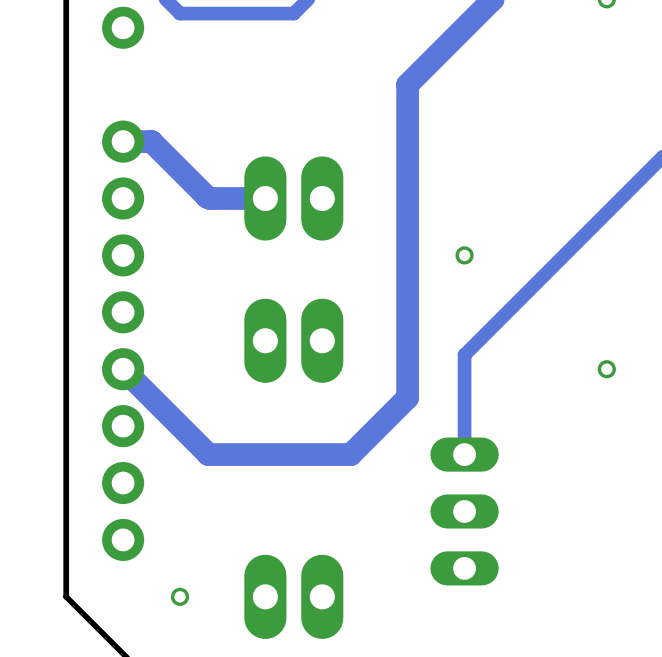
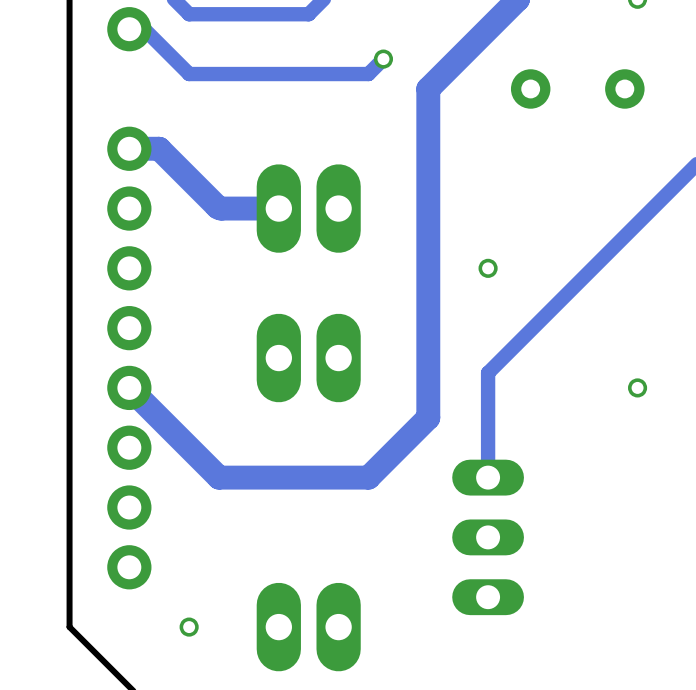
track: none -> (129, 29) (144, 29) (189, 74) (368, 74) (383, 59)
via: none -> (383, 59)
part: none -> (577, 88)

